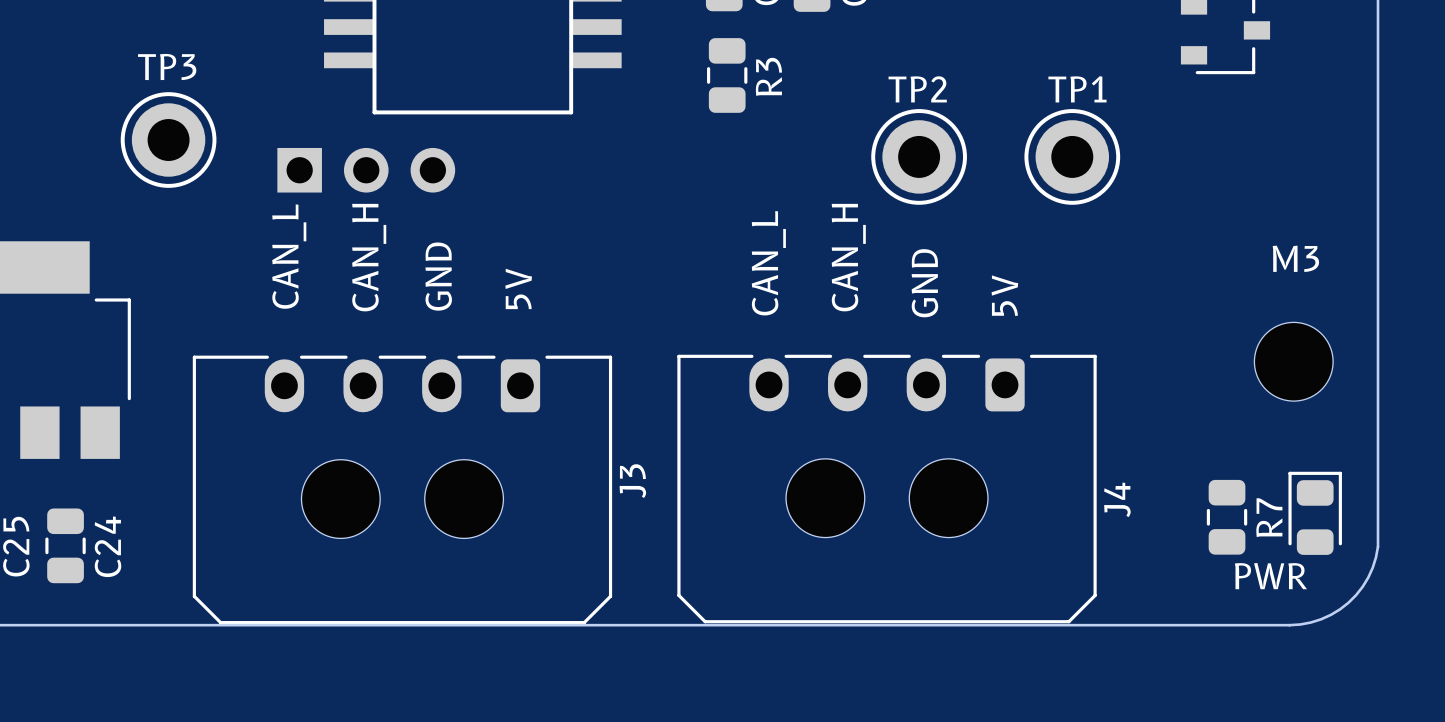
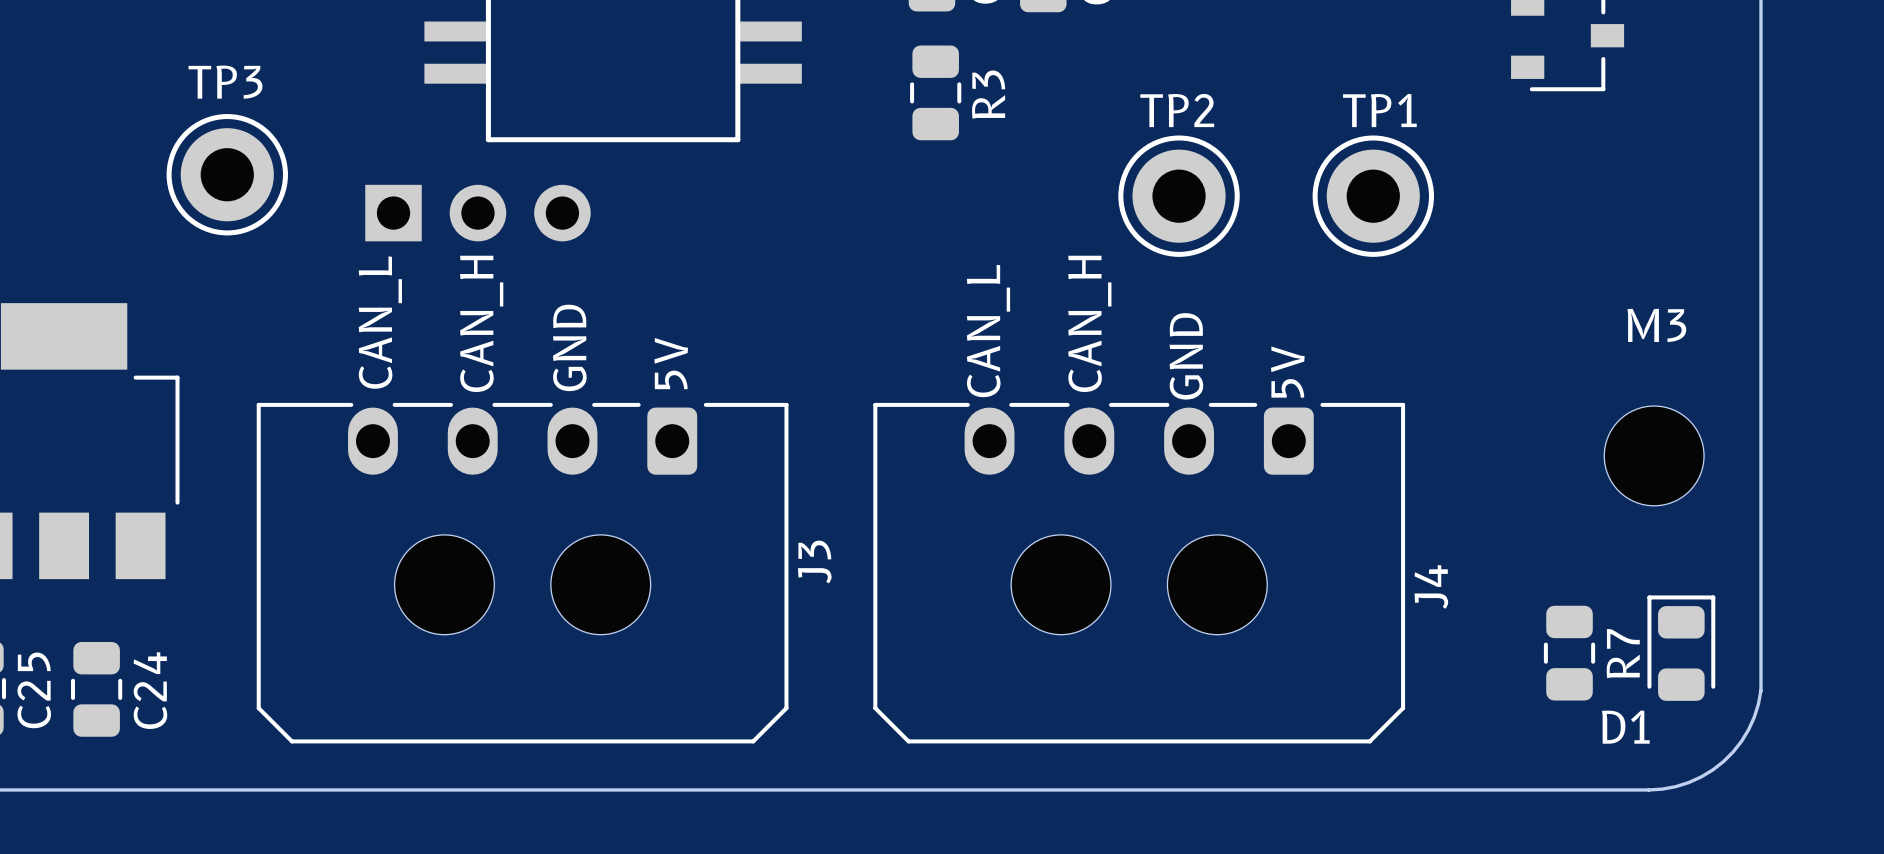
J3 position: (402, 489) -> (522, 573)
J4 position: (887, 489) -> (1139, 573)
D1 name: none -> D1 (1625, 727)
text: PWR (1270, 576) -> none

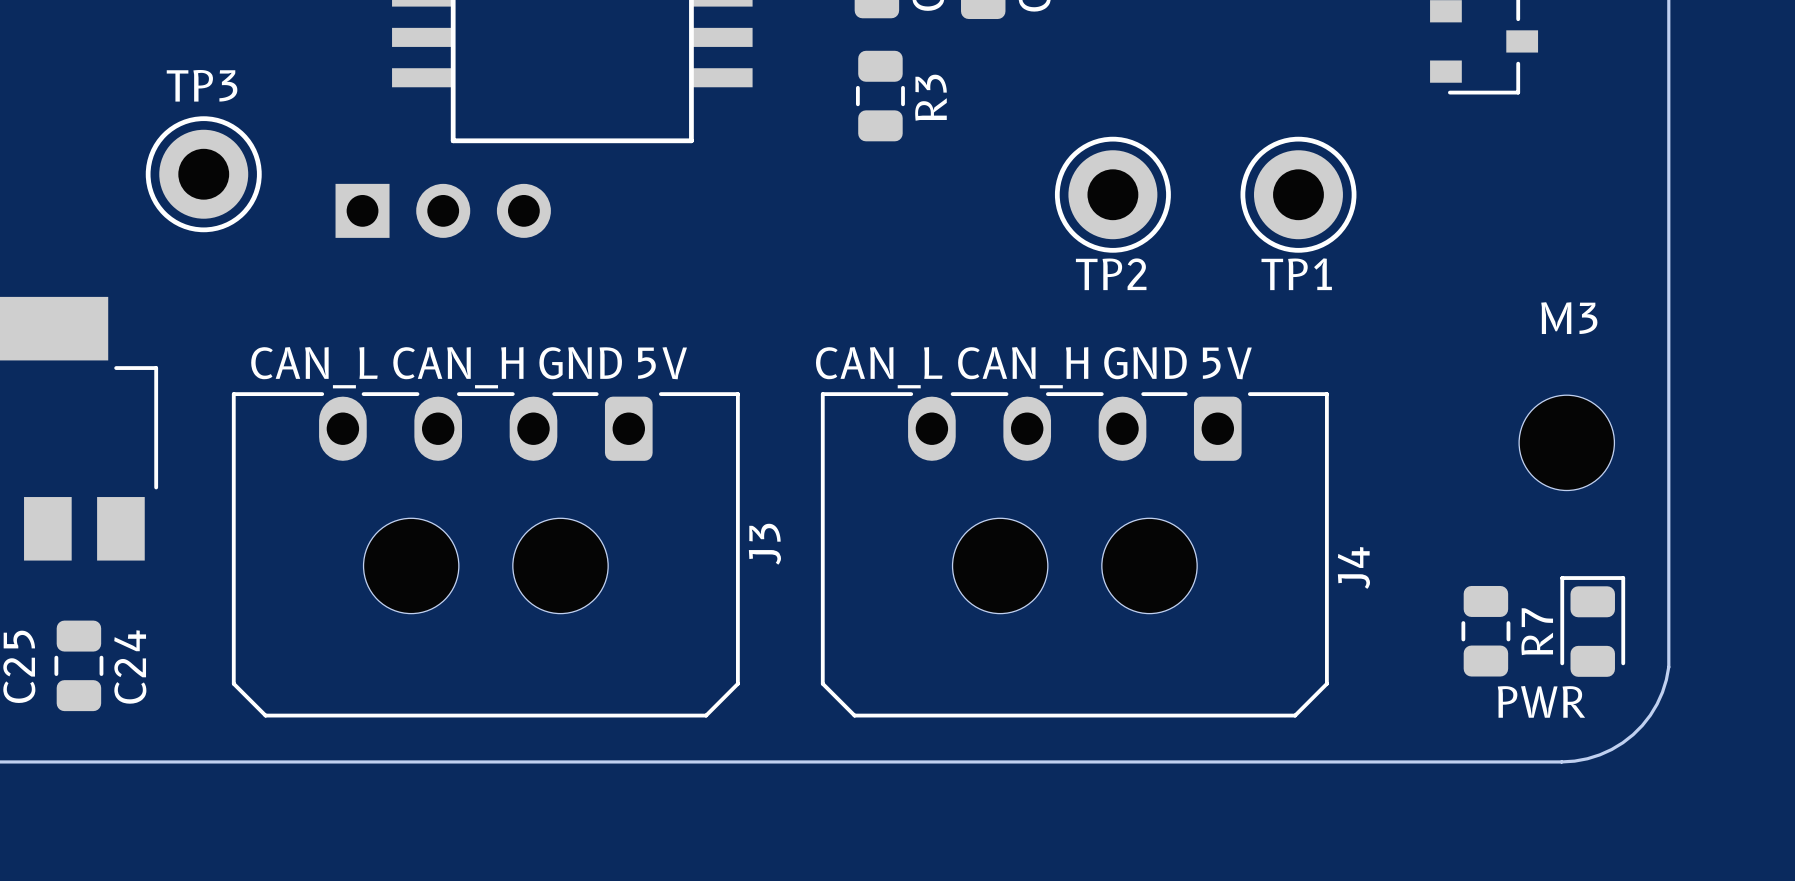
TP2 name position: TP2 (1177, 110) -> TP2 (1111, 274)
TP1 name position: TP1 (1379, 110) -> TP1 (1296, 274)
text rotation: 0° (380, 322) -> 90° clockwise (314, 367)
text rotation: 0° (481, 323) -> 90° clockwise (458, 367)
text rotation: 0° (1089, 323) -> 90° clockwise (1023, 367)
text rotation: 0° (988, 331) -> 90° clockwise (879, 367)
text rotation: 0° (569, 347) -> 90° clockwise (580, 363)
text rotation: 0° (1186, 356) -> 90° clockwise (1145, 363)
text rotation: 0° (671, 363) -> 90° clockwise (662, 363)
text rotation: 0° (1287, 372) -> 90° clockwise (1227, 363)
D1 name: D1 (1625, 727) -> PWR (1541, 701)

